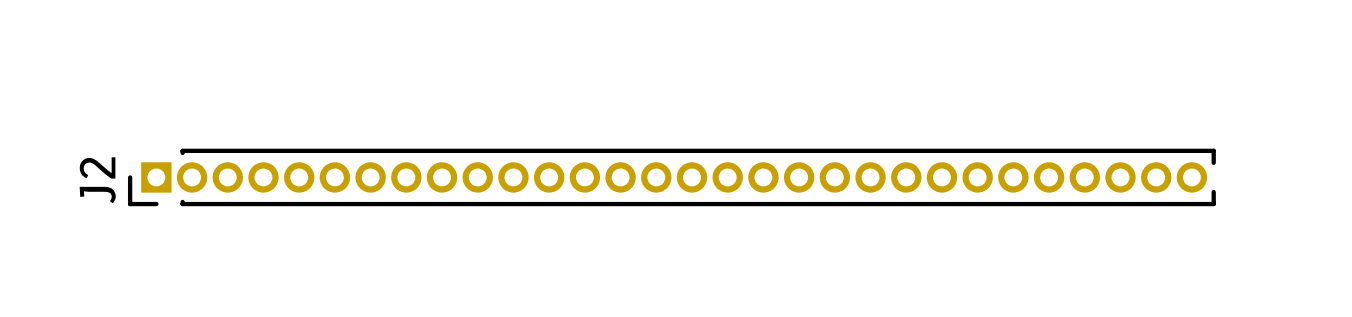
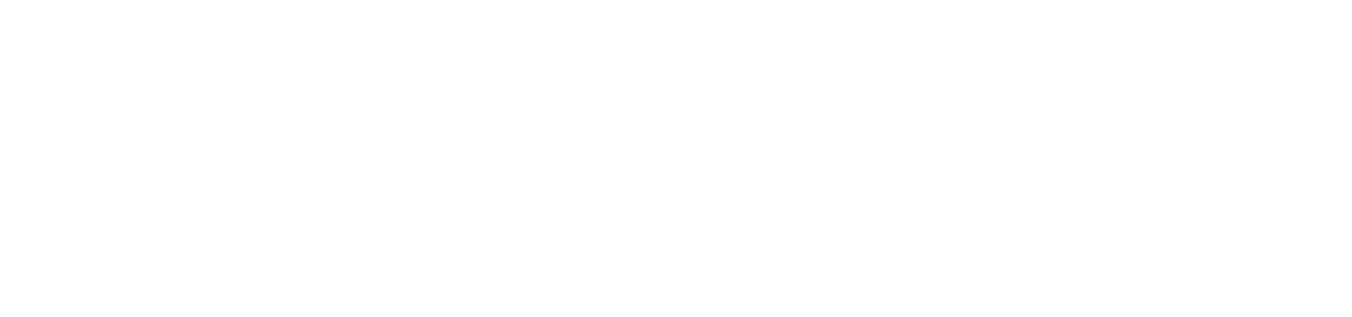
J2: (671, 177) -> none

